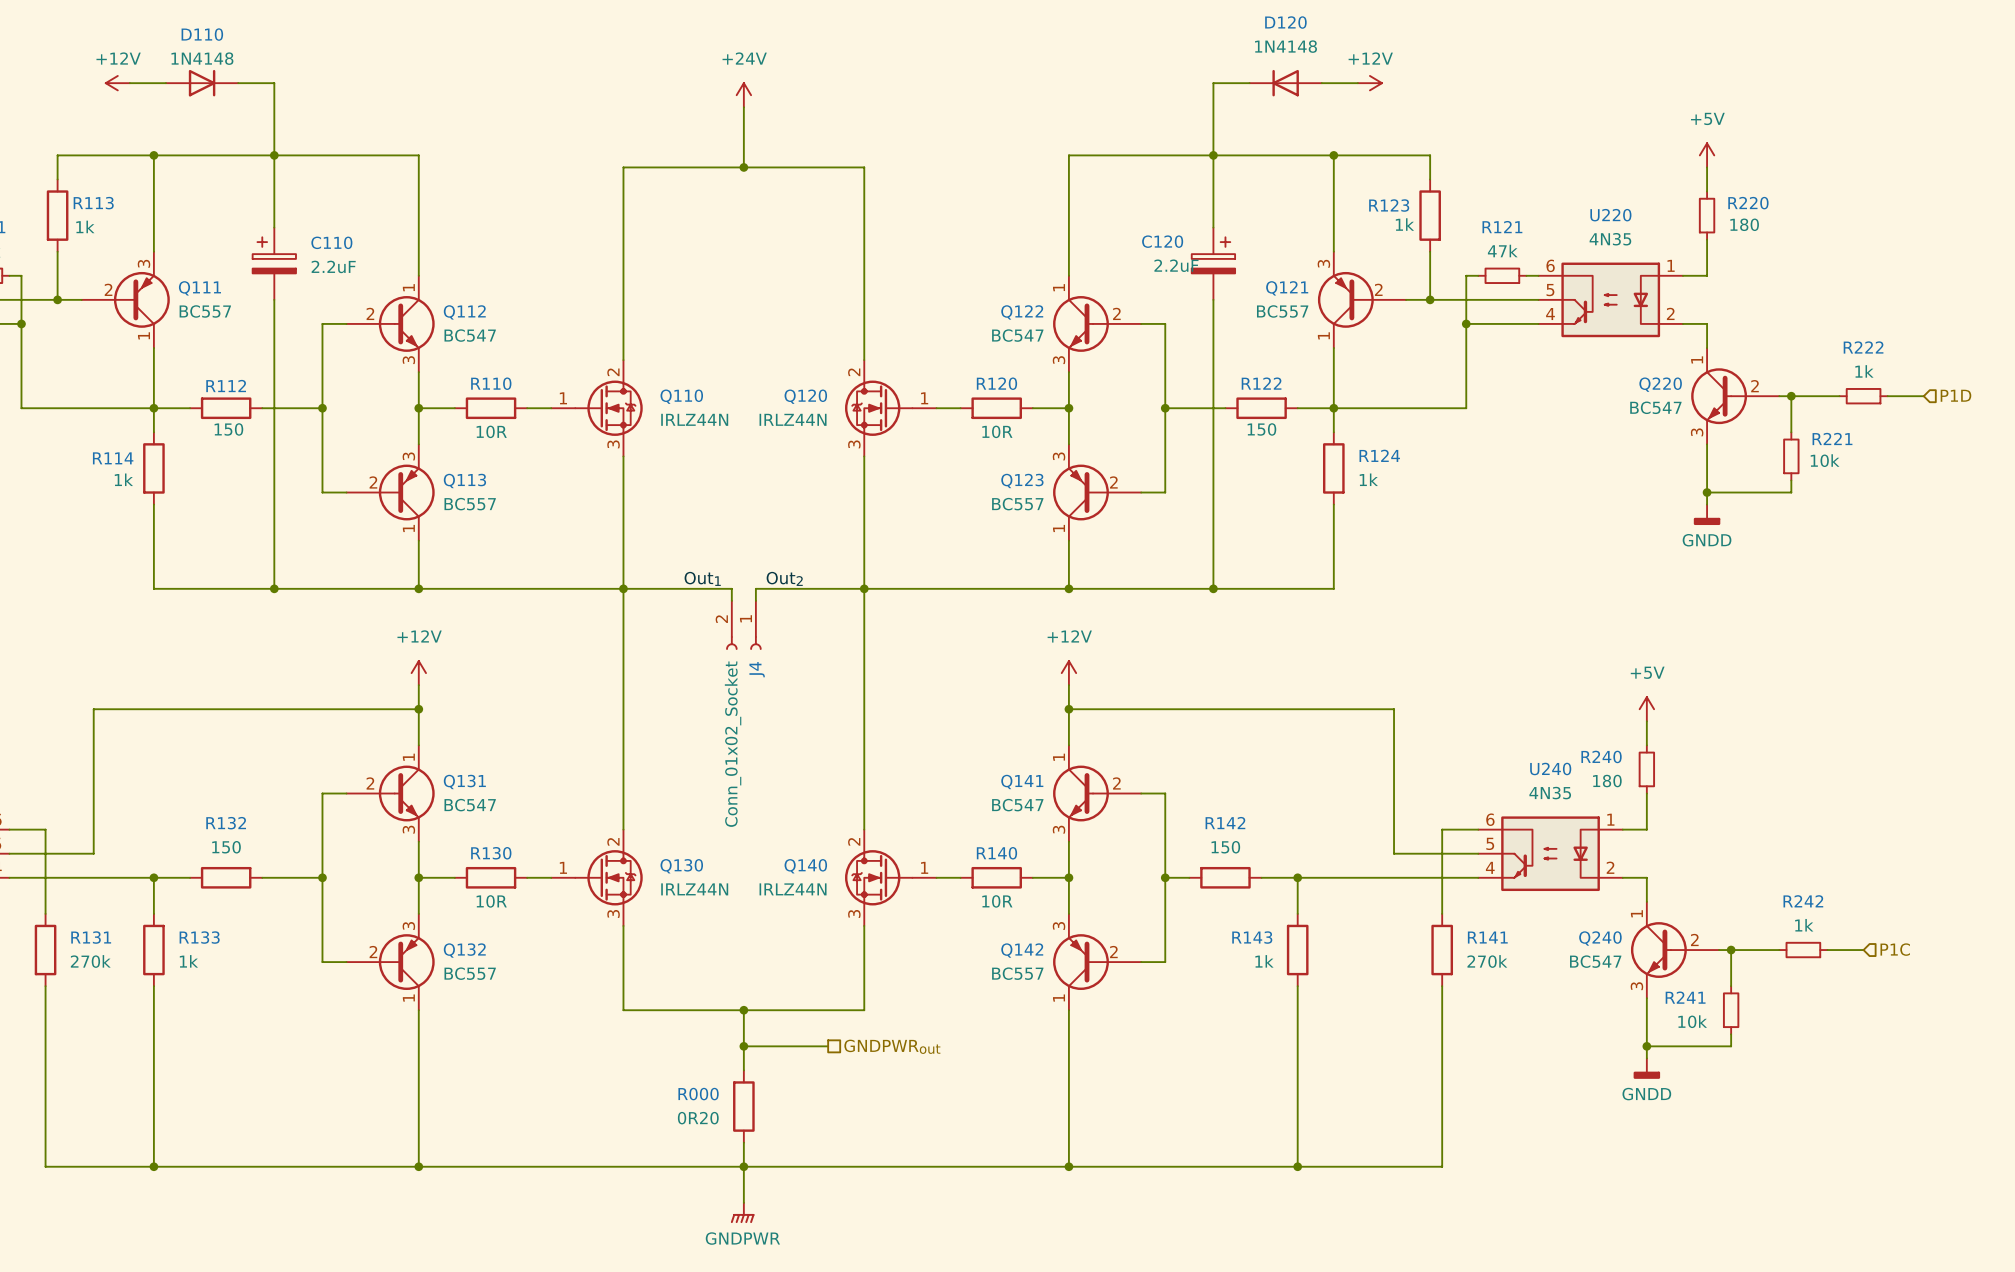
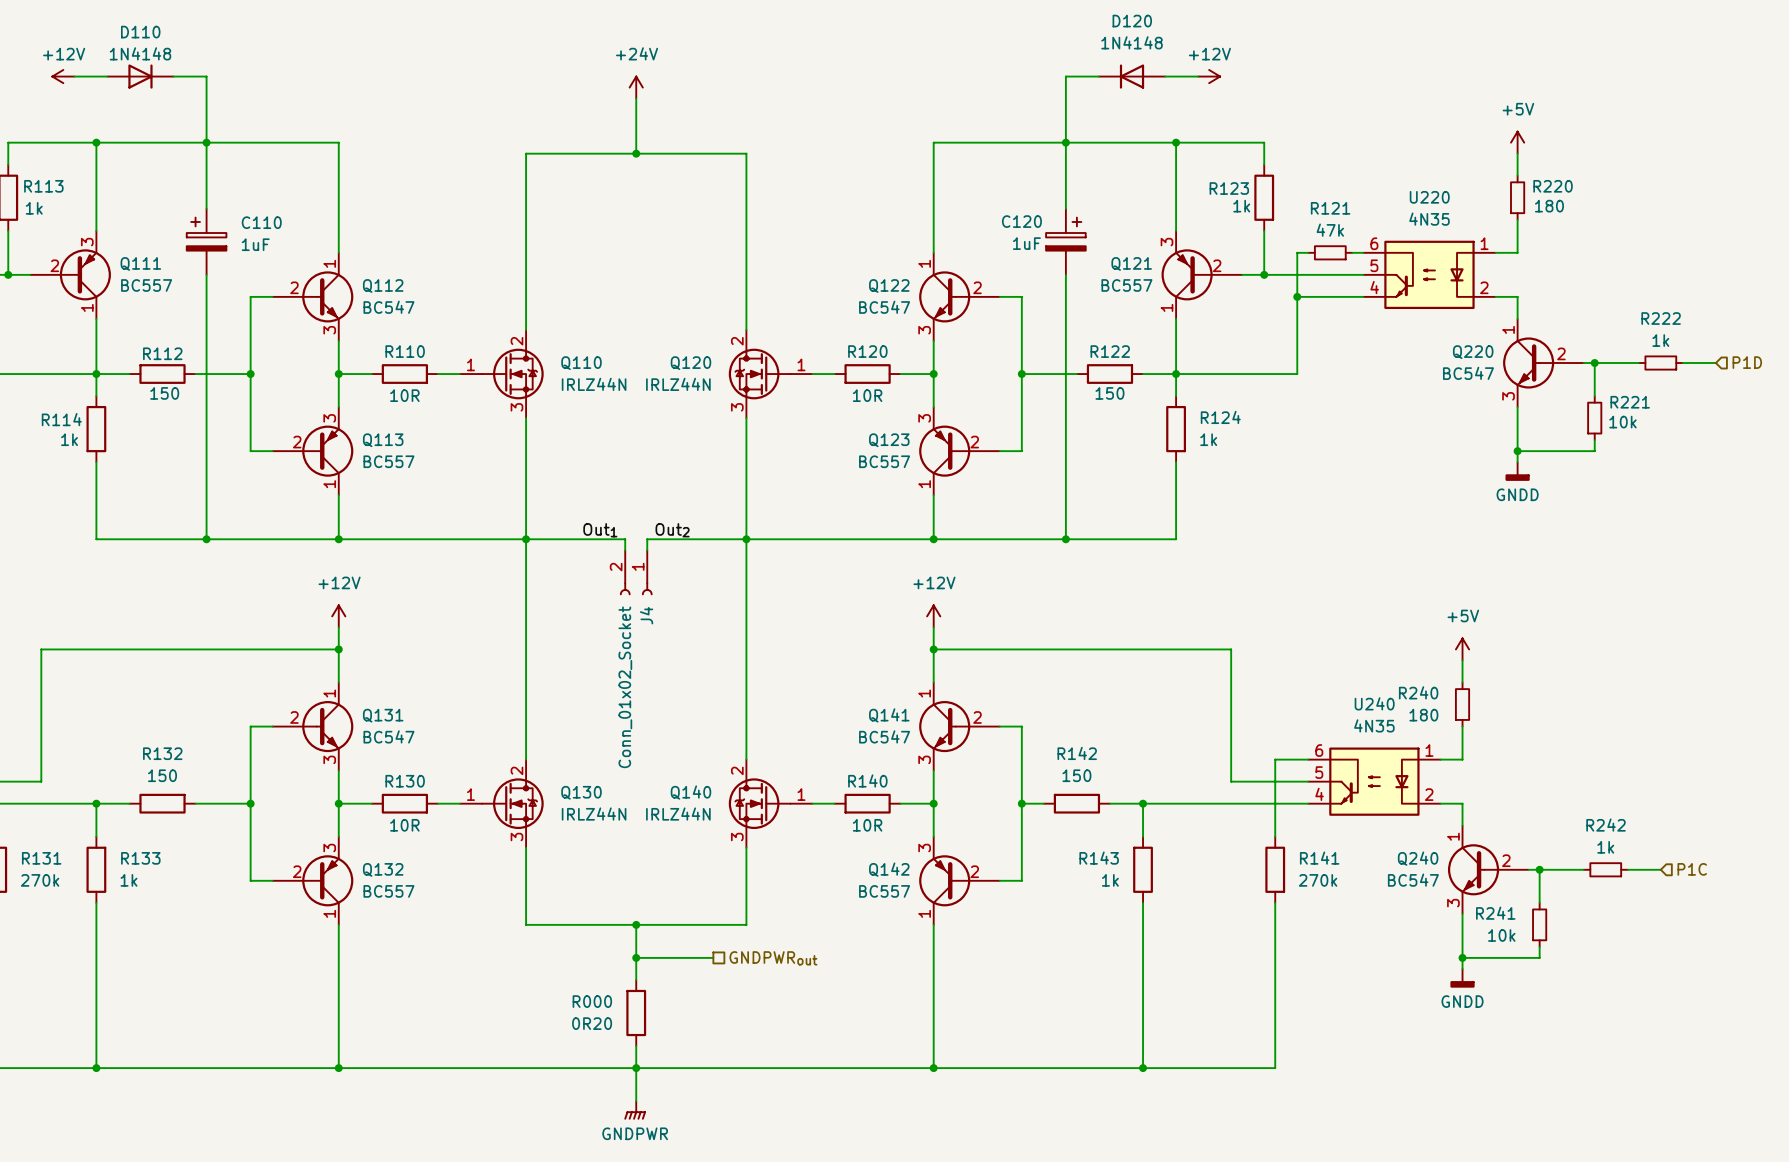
C120 value: 2.2uF (1176, 265) -> 1uF (1026, 243)
C110 value: 2.2uF (333, 266) -> 1uF (255, 244)

